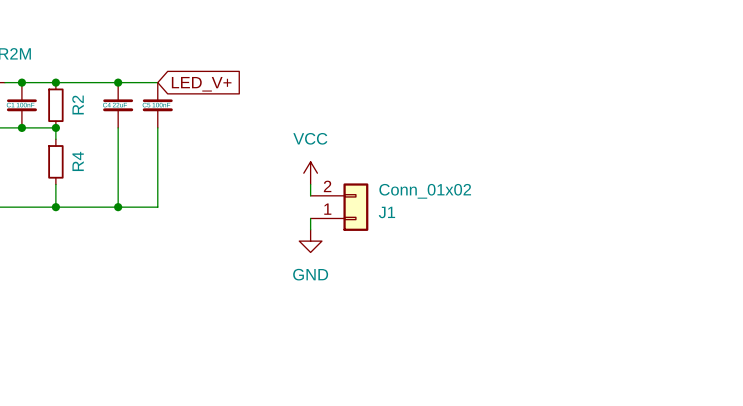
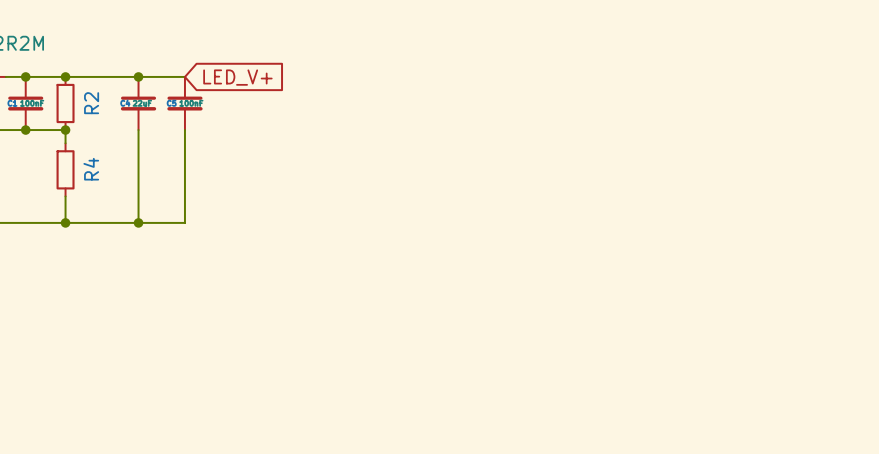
power symbol: VCC (310, 173) -> none
wire: (310, 184) (310, 195) -> none
J1: Conn_01x02 (339, 207) -> none
wire: (310, 218) (310, 229) -> none
power symbol: GND (310, 241) -> none

